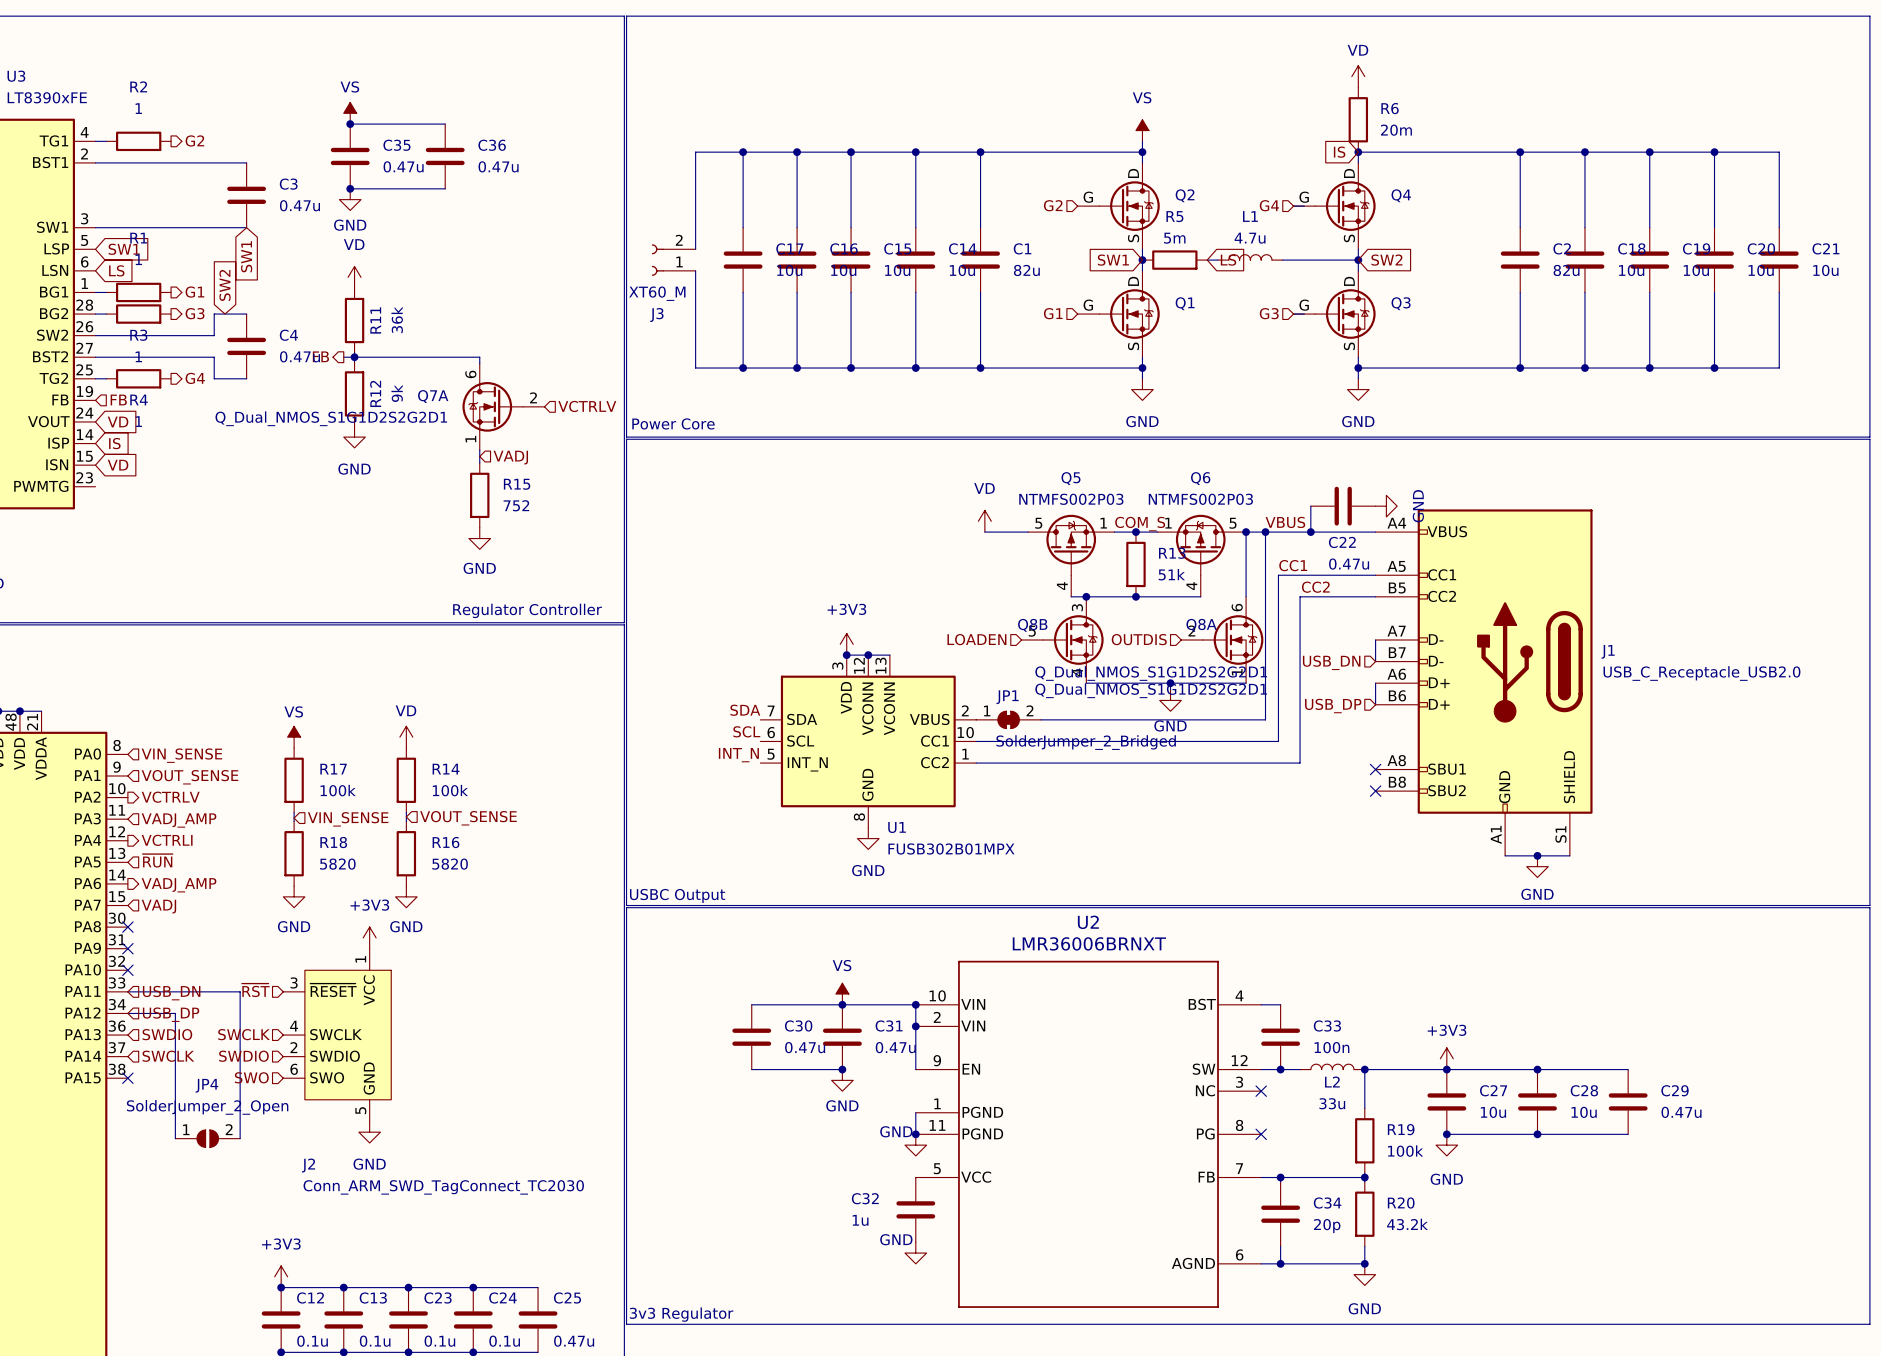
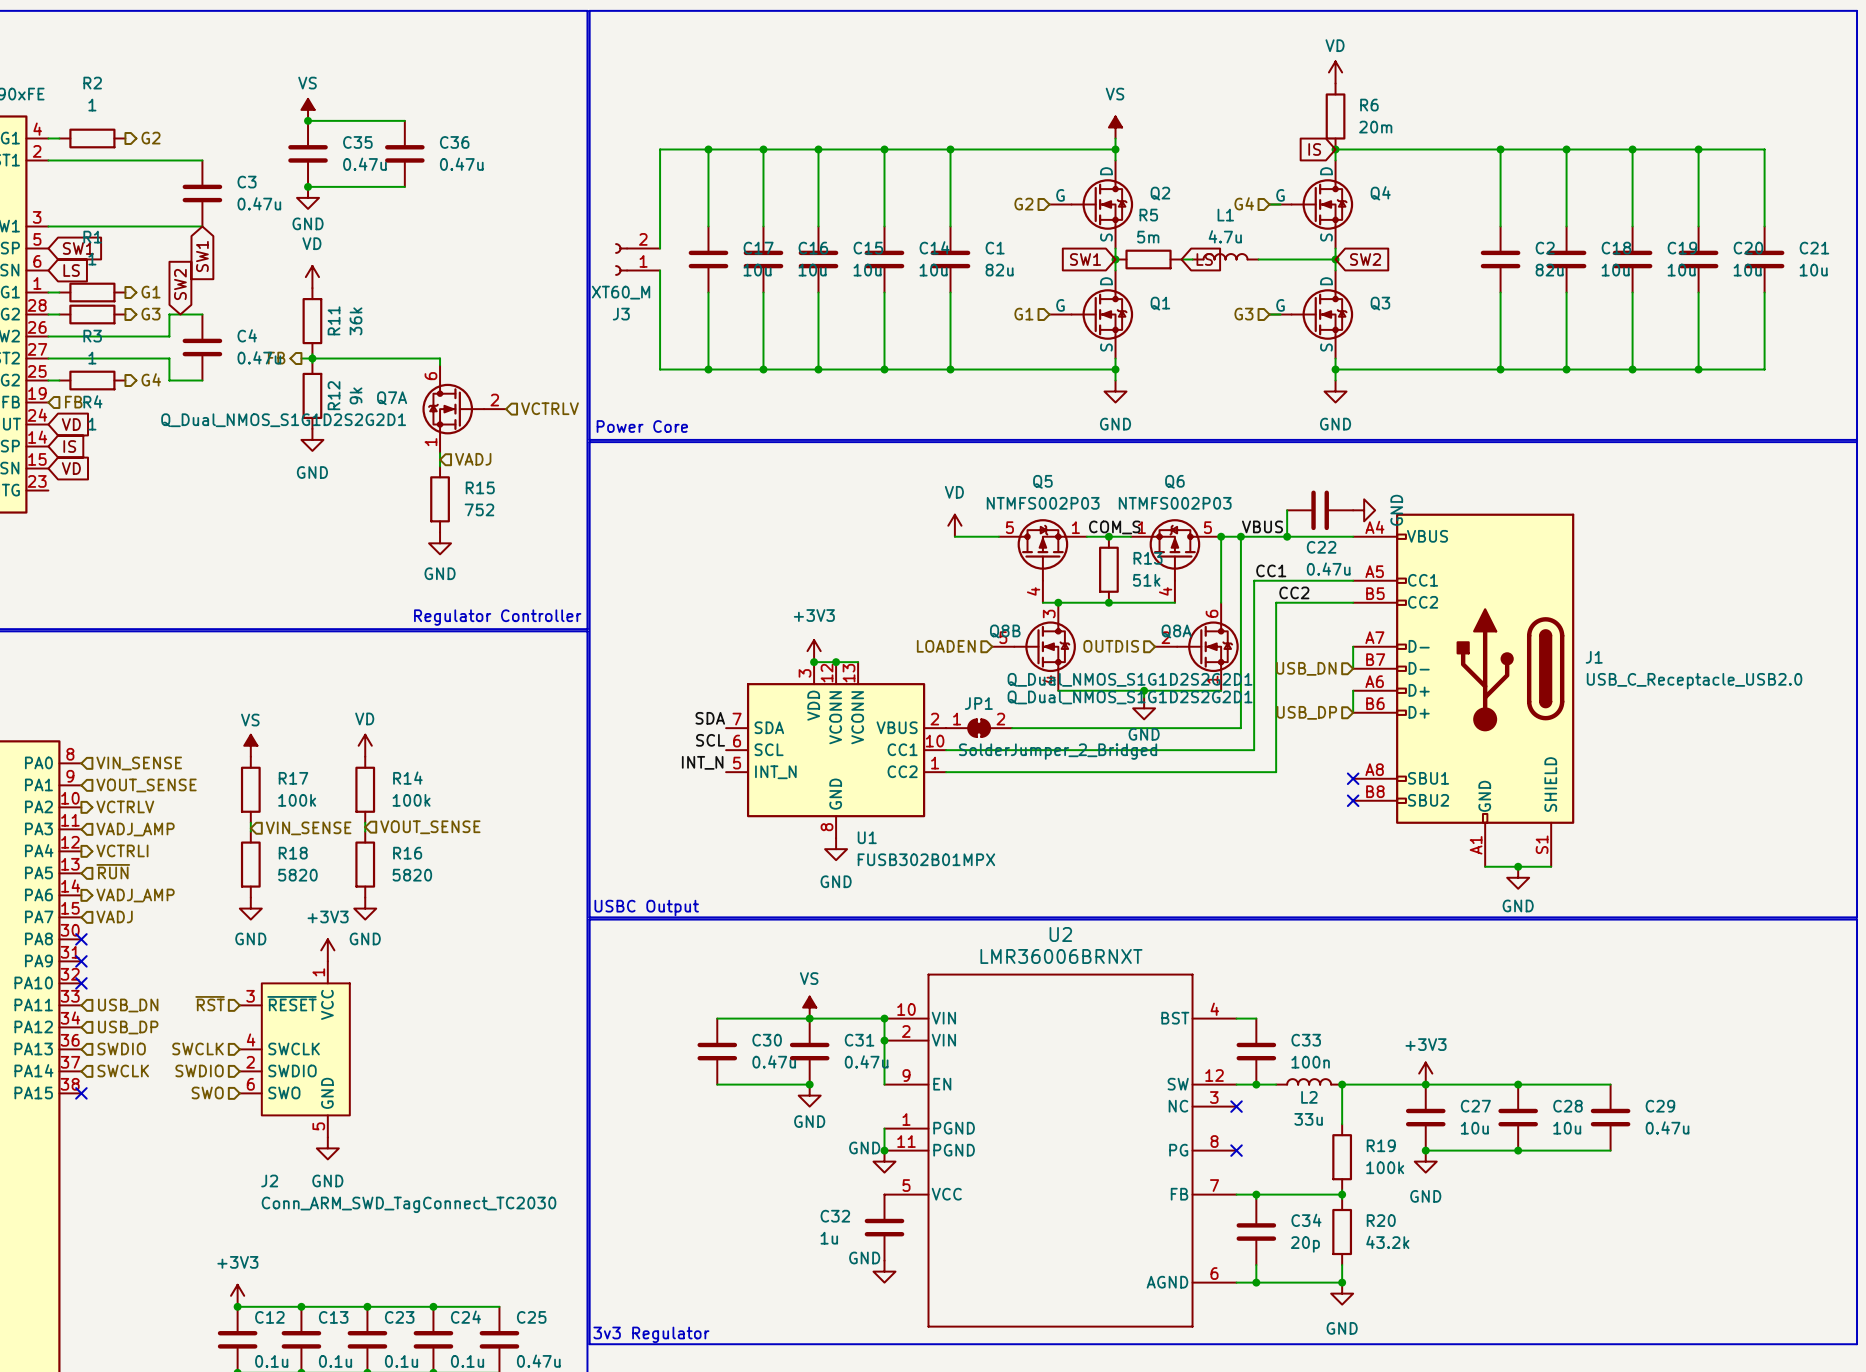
wire: (127, 991) (240, 991) (240, 1138) -> none
wire: (127, 1013) (175, 1013) (175, 1138) -> none
JP4: SolderJumper_2_Open (207, 1138) -> none

